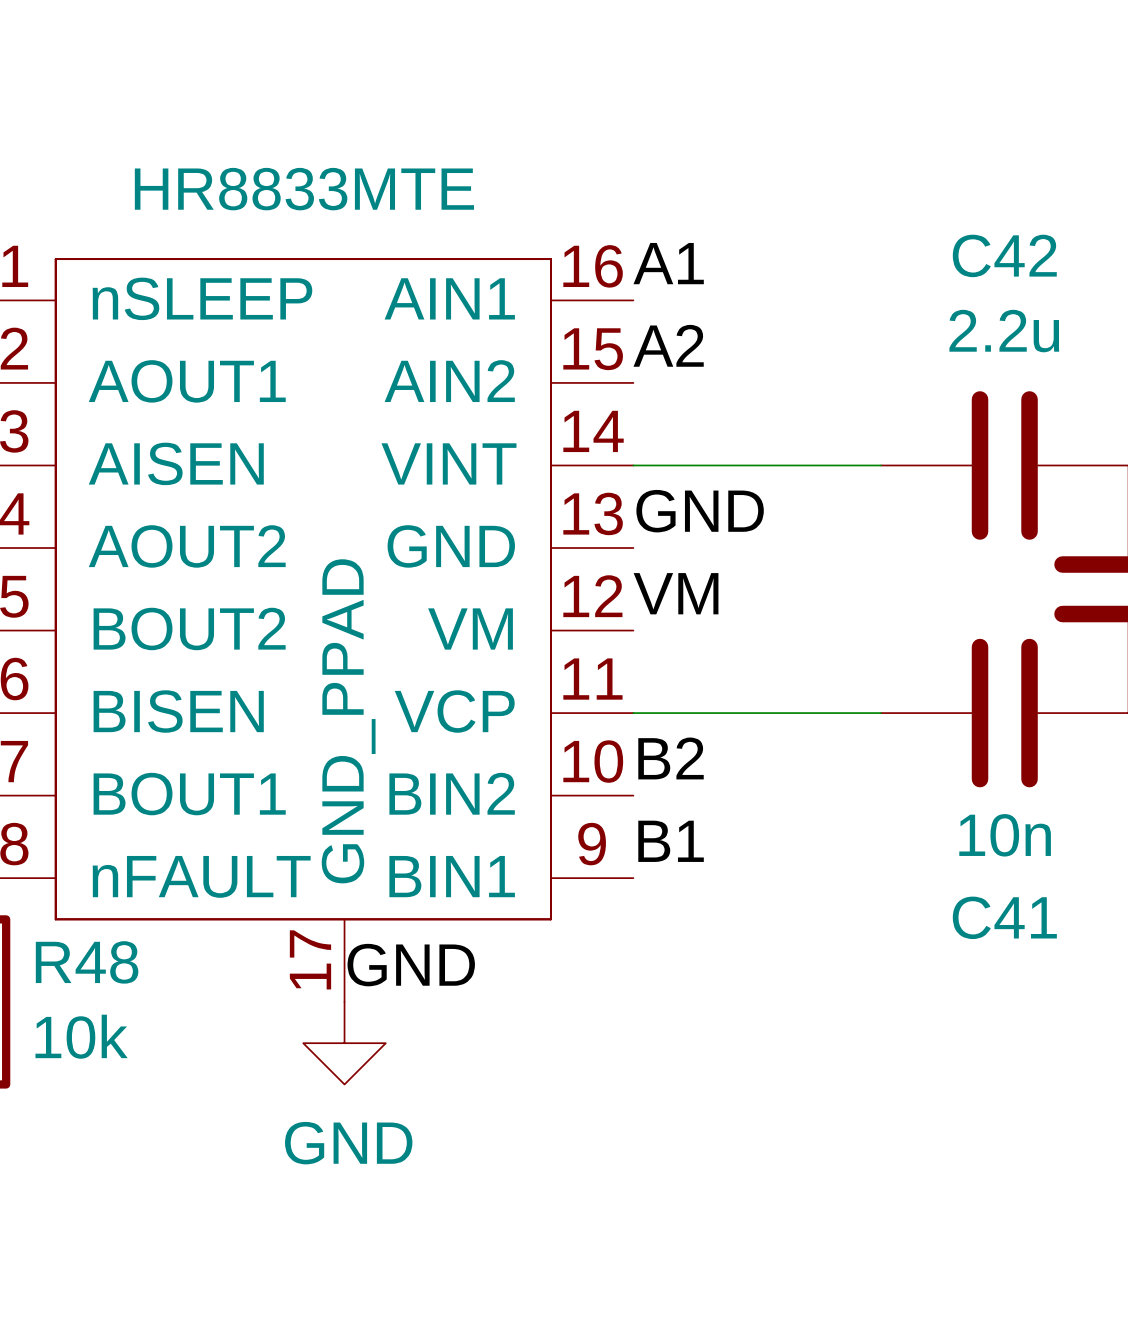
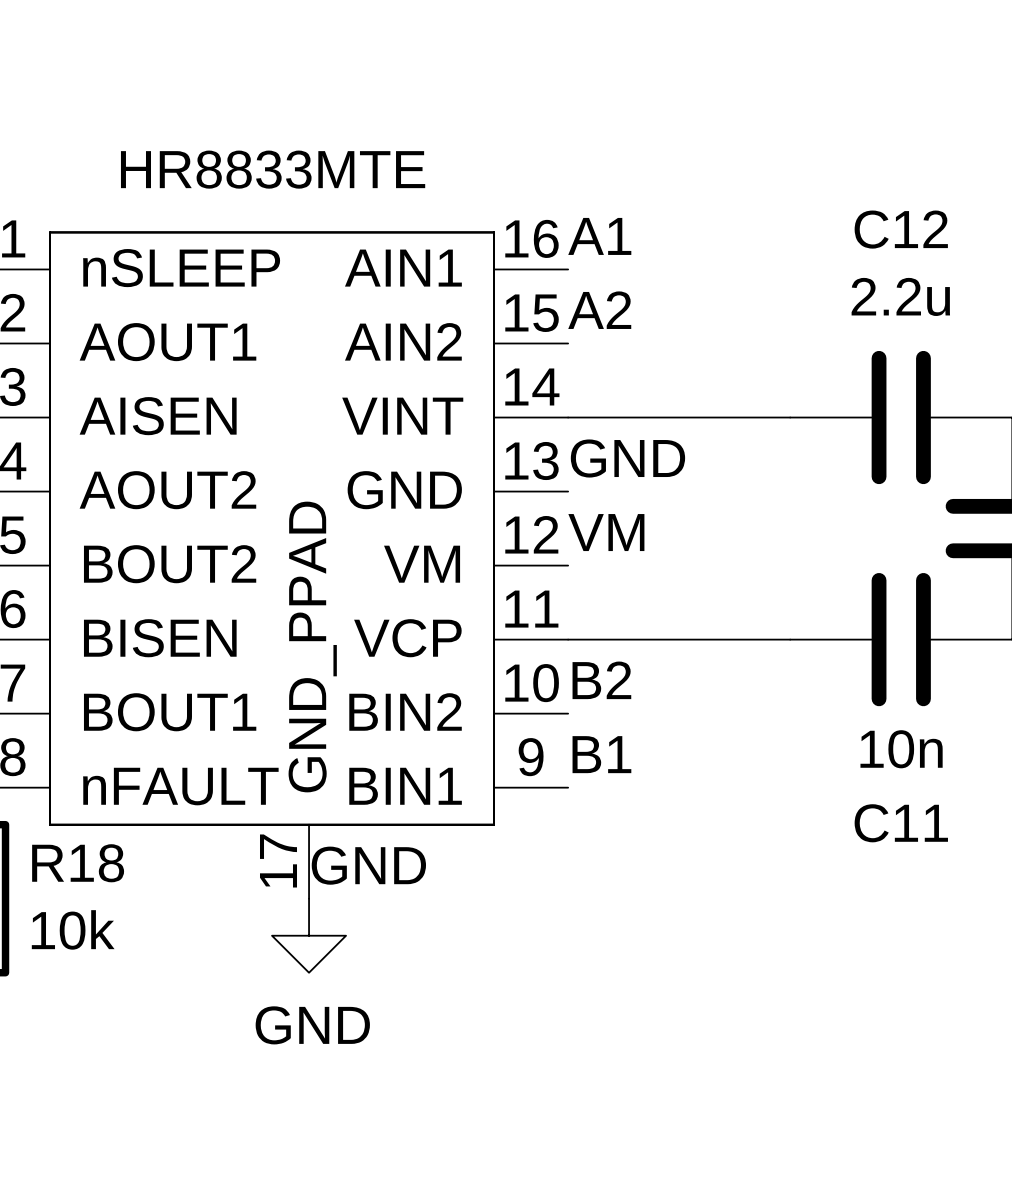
C42 name: C42 (1004, 255) -> C12 (901, 229)
C41 name: C41 (1004, 917) -> C11 (901, 823)
R48 name: R48 (87, 962) -> R18 (78, 863)

